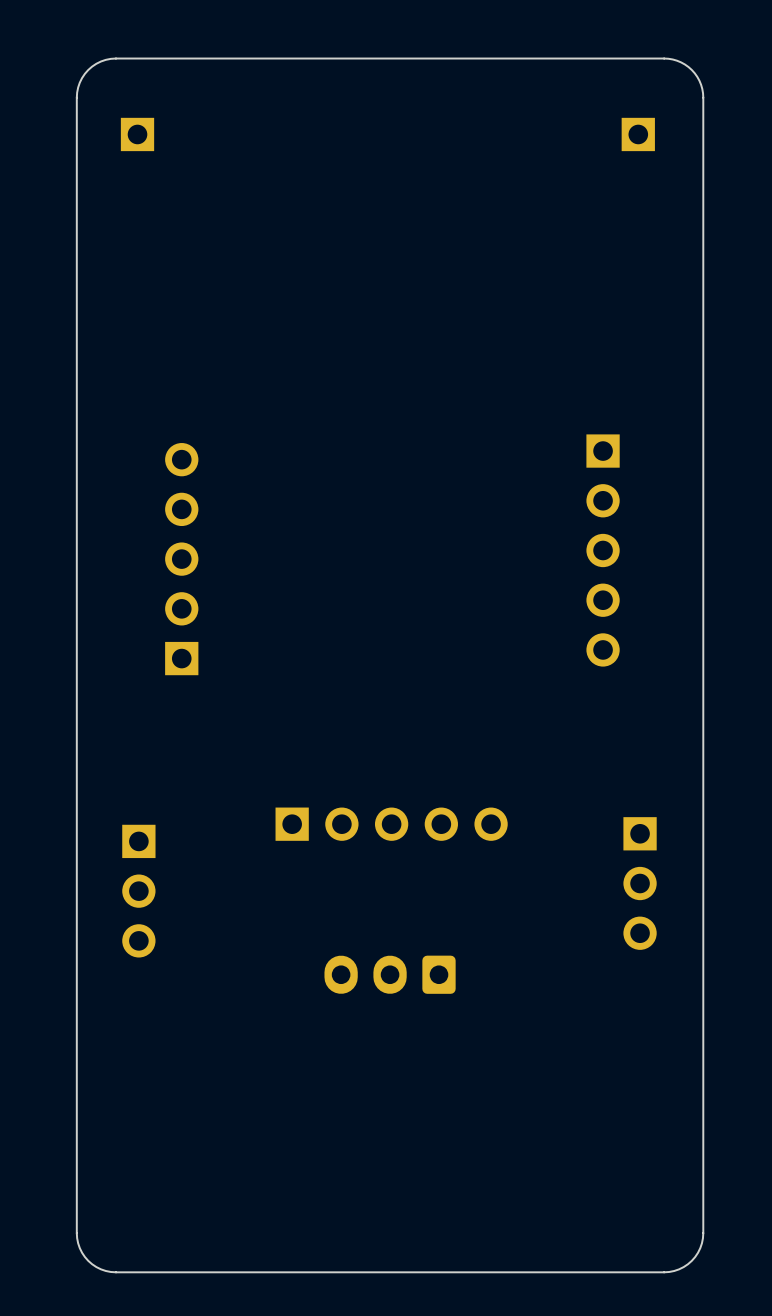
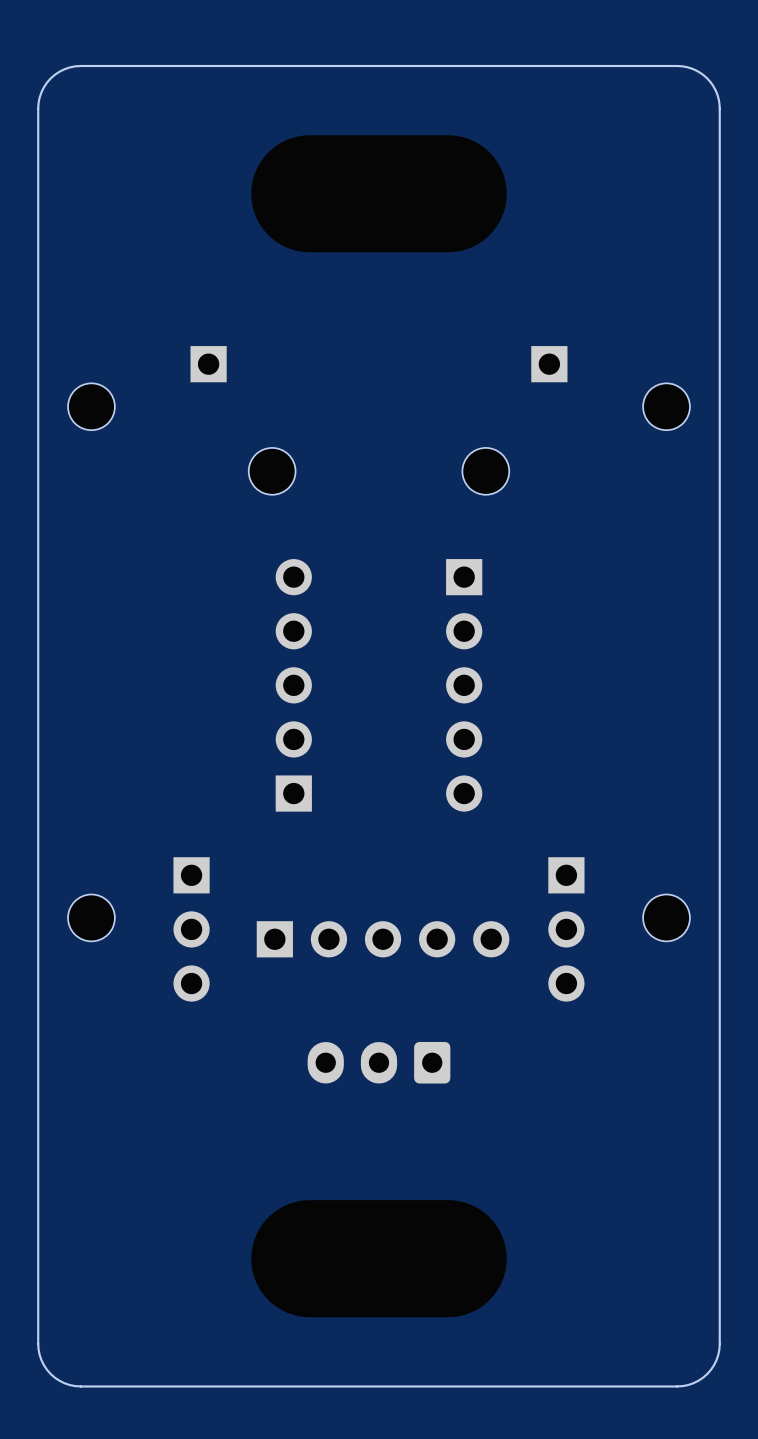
part position: (137, 134) -> (208, 364)
part position: (638, 134) -> (549, 364)
part: none -> (91, 406)
part: none -> (666, 406)
part: none -> (272, 471)
part: none -> (485, 471)
part: (603, 550) -> none
part: (181, 559) -> none
part: none -> (293, 685)
part: none -> (464, 685)
part position: (391, 824) -> (383, 939)
part: none -> (91, 917)
part: none -> (666, 917)
part position: (640, 883) -> (566, 929)
part position: (138, 891) -> (191, 929)

